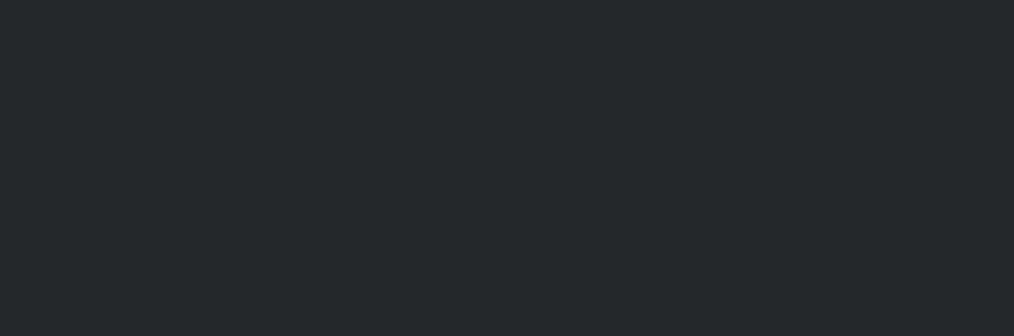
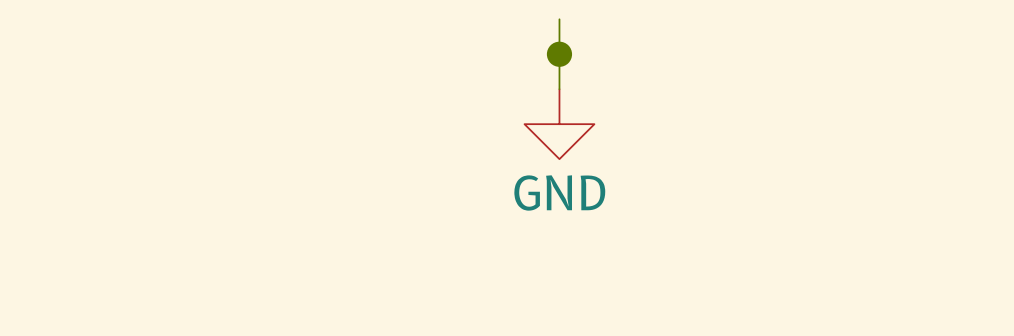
wire: none -> (559, 19) (559, 89)
junction: none -> (559, 54)
power symbol: none -> GND (559, 124)

